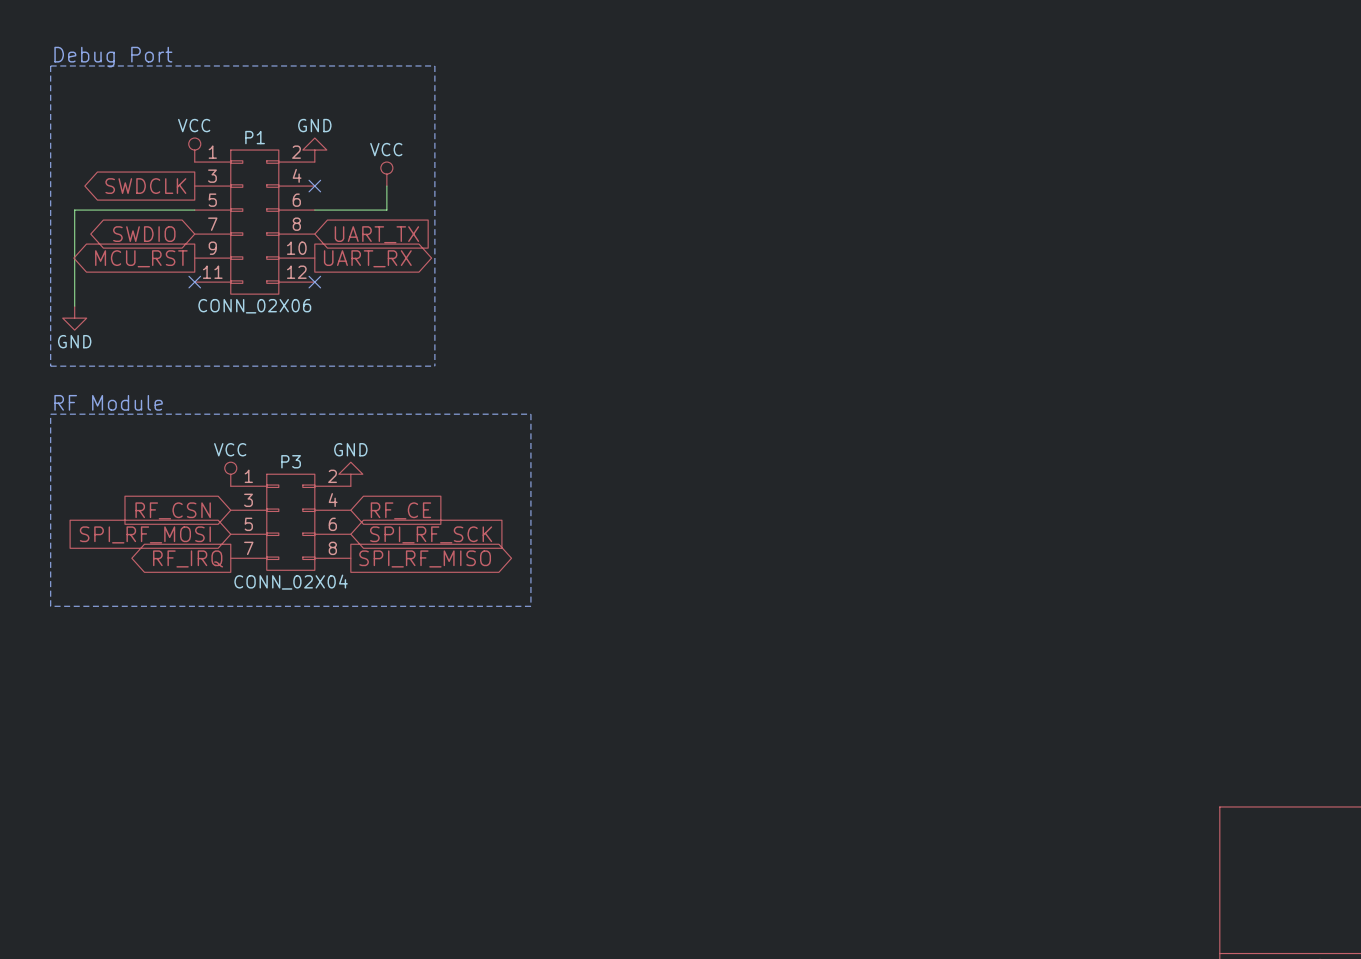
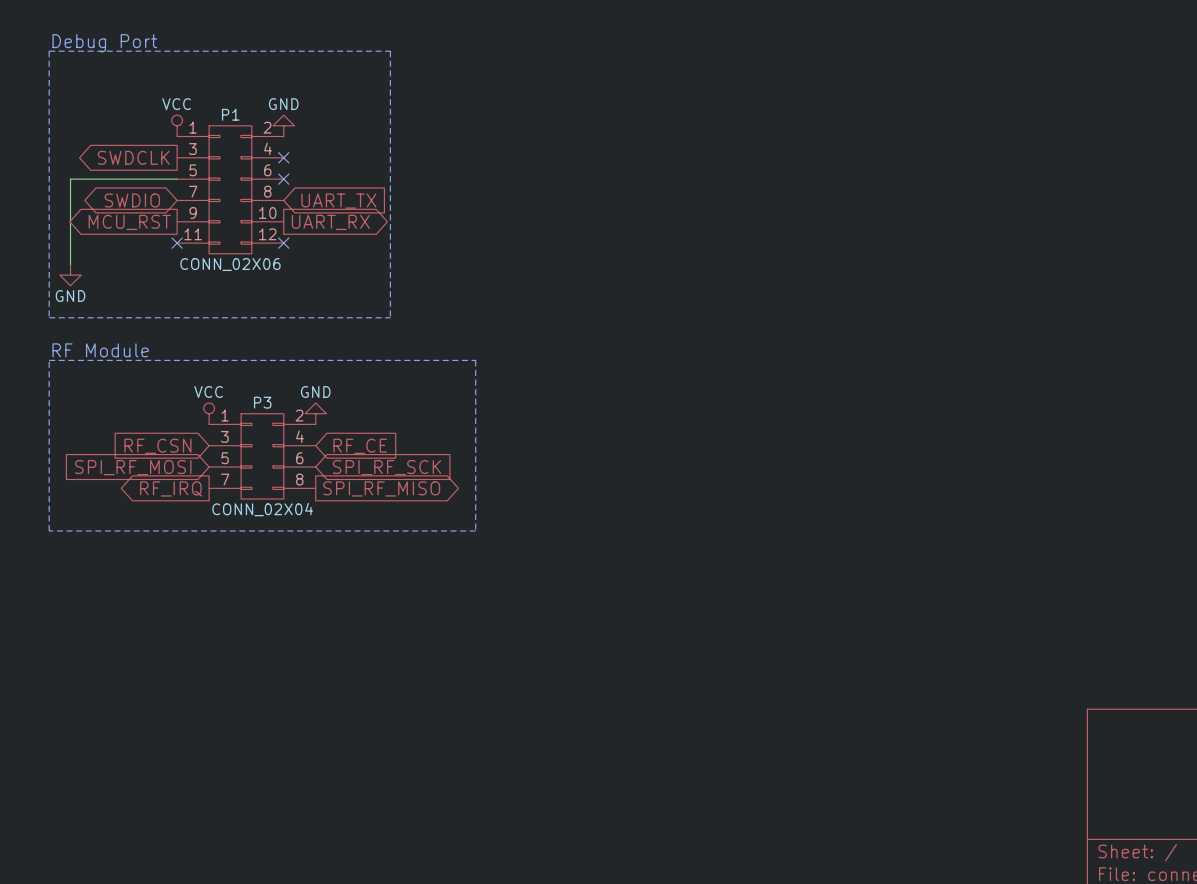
power symbol: VCC (386, 174) -> none
wire: (386, 186) (386, 210) (314, 210) -> none
no-connect mark: none -> (283, 179)

